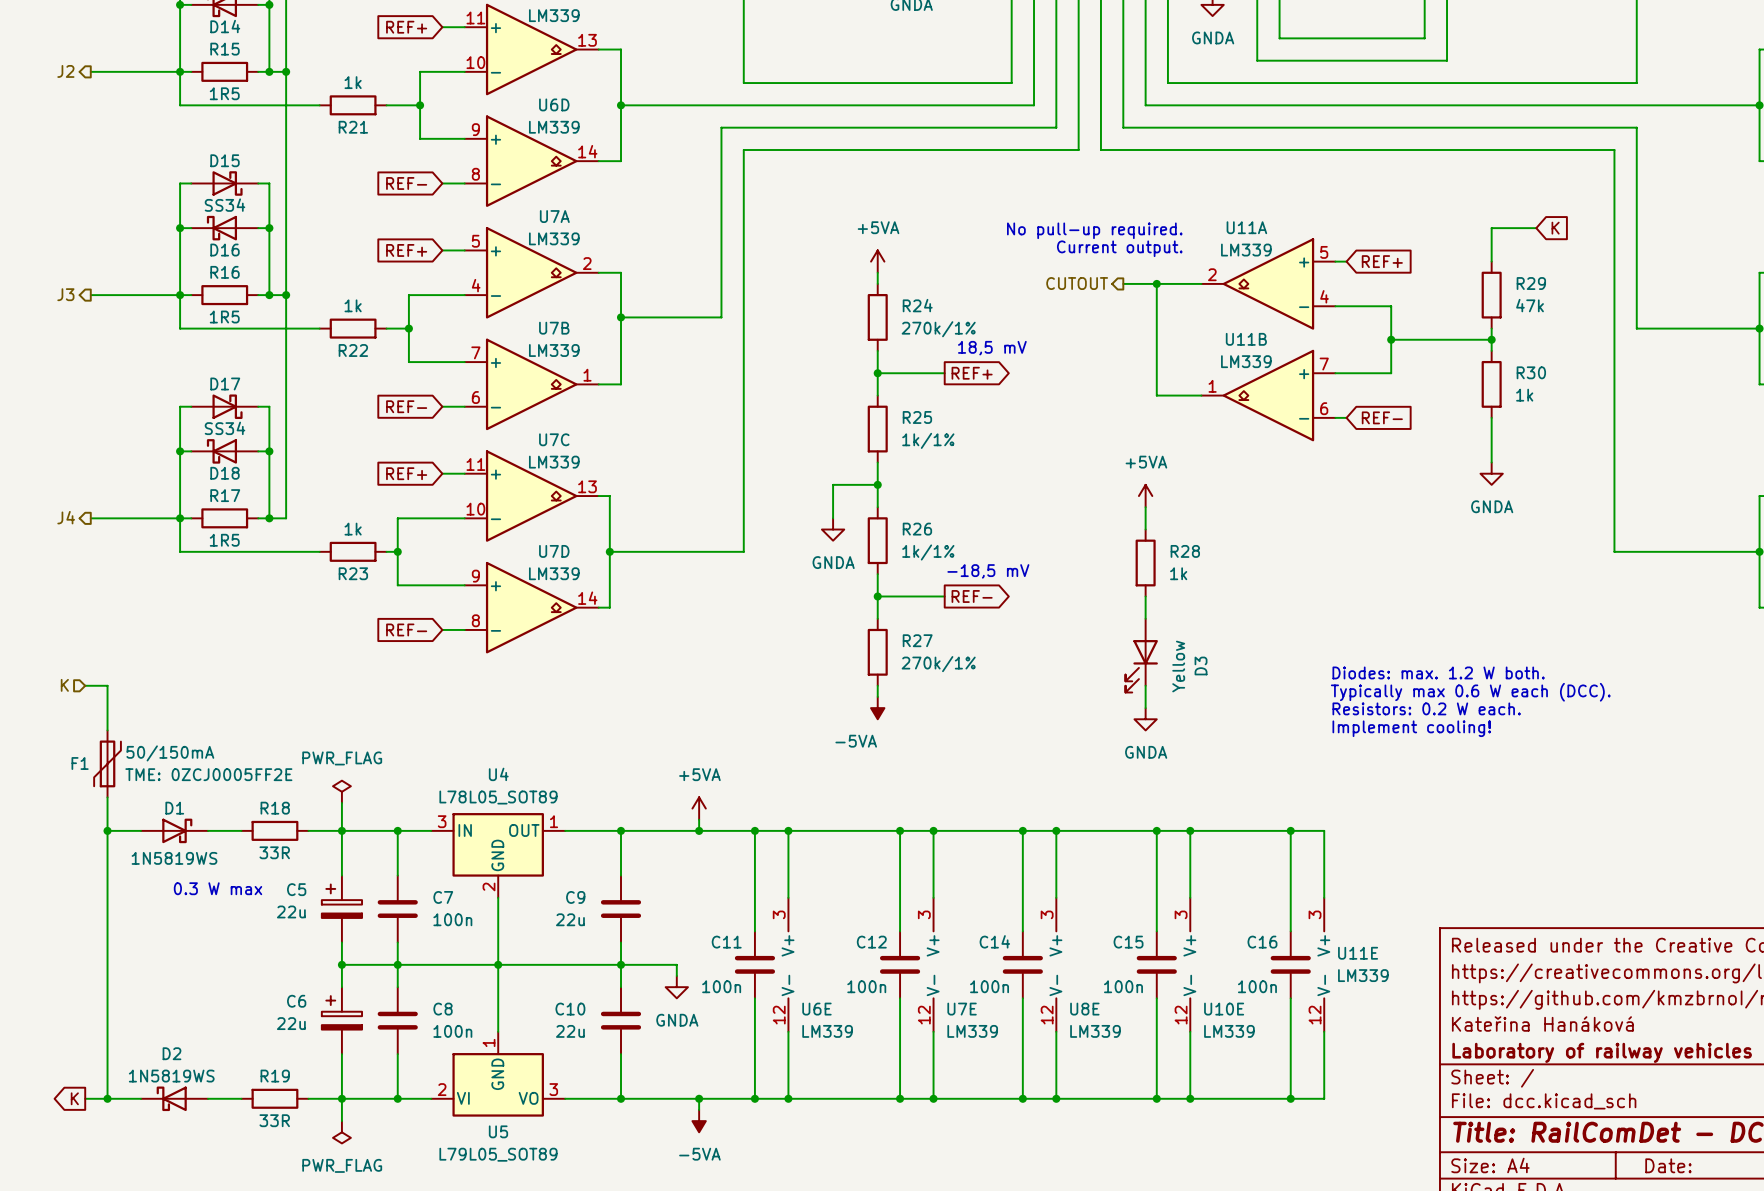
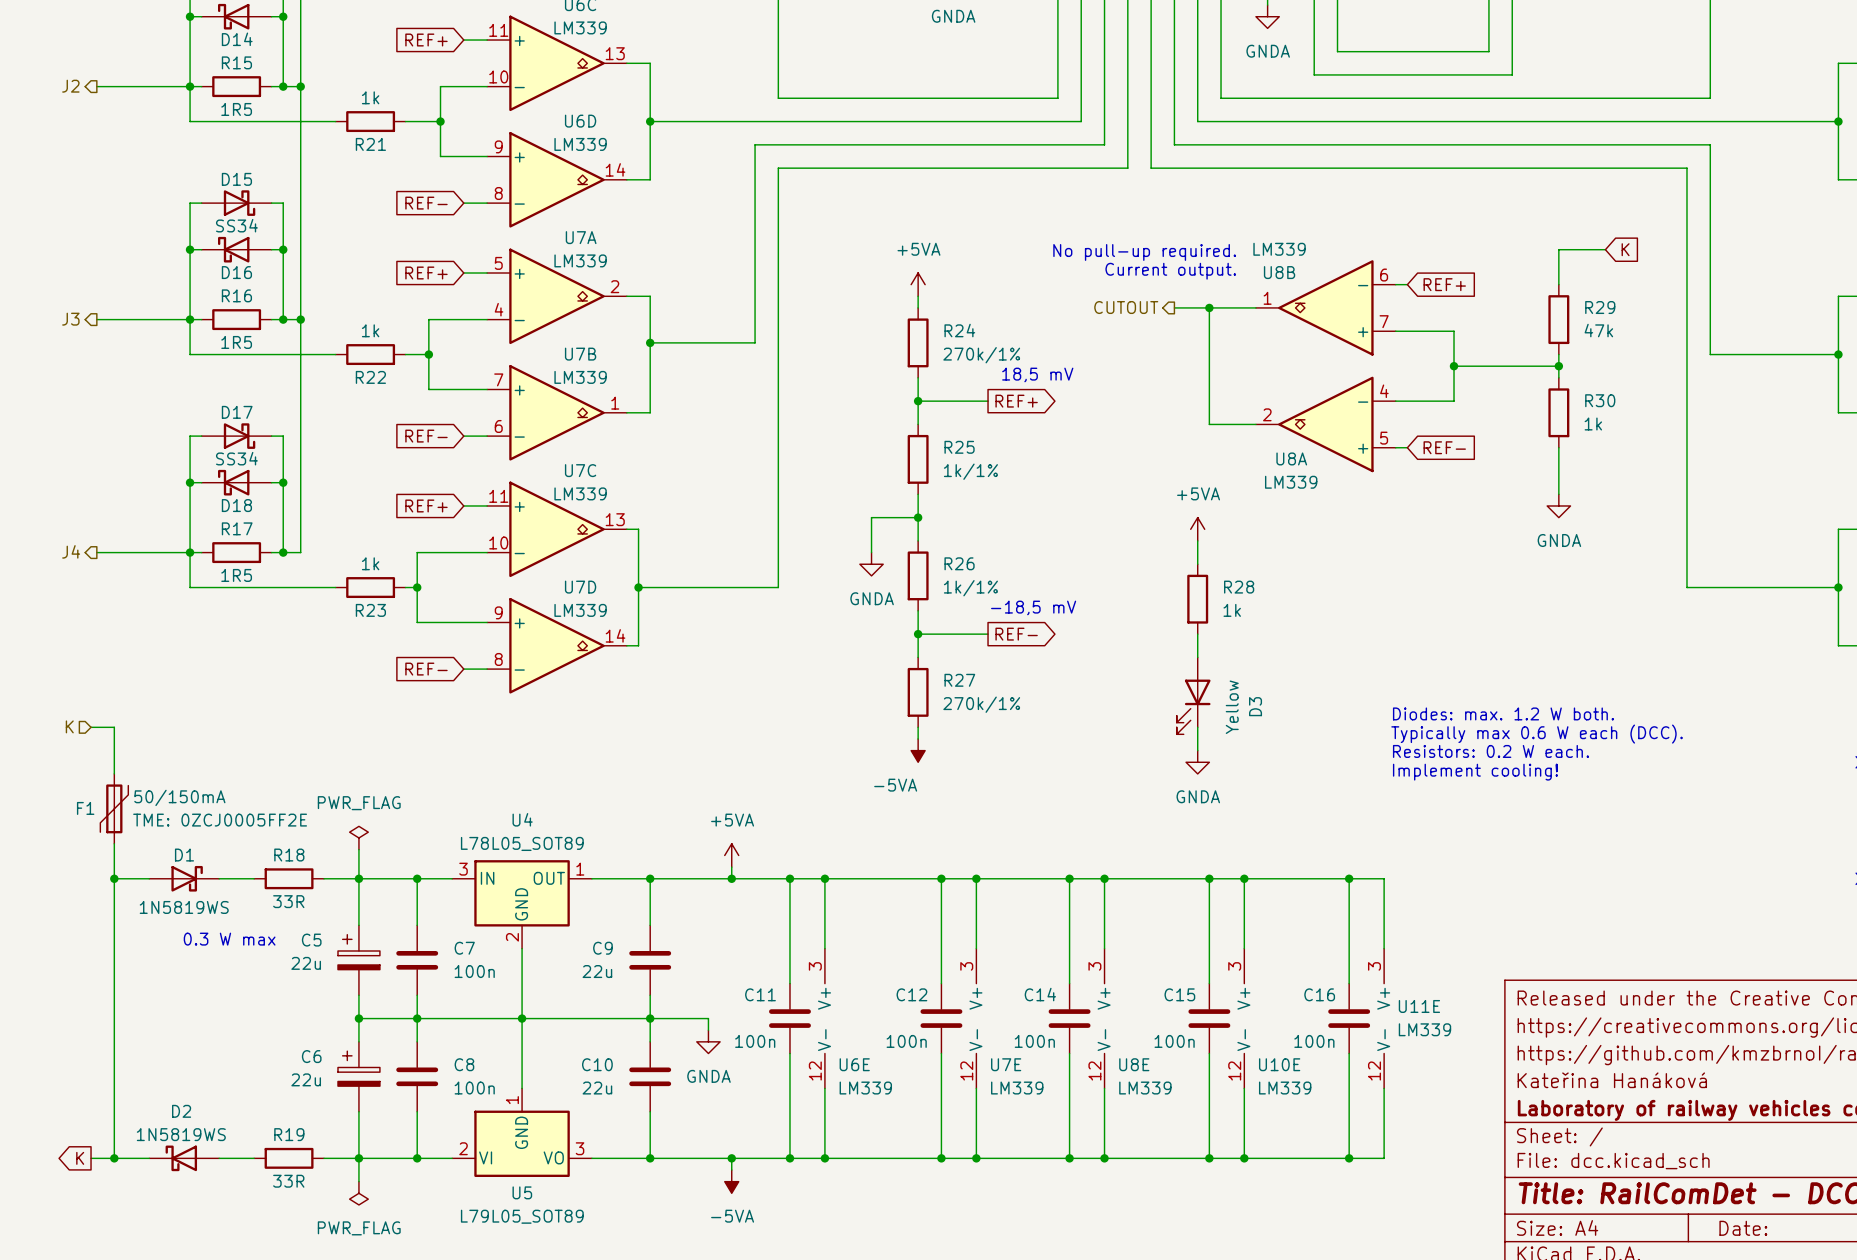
U11A: LM339 (1268, 283) -> none
U8B: none -> LM339 (1325, 307)
U11B: LM339 (1268, 395) -> none
U8A: none -> LM339 (1325, 424)

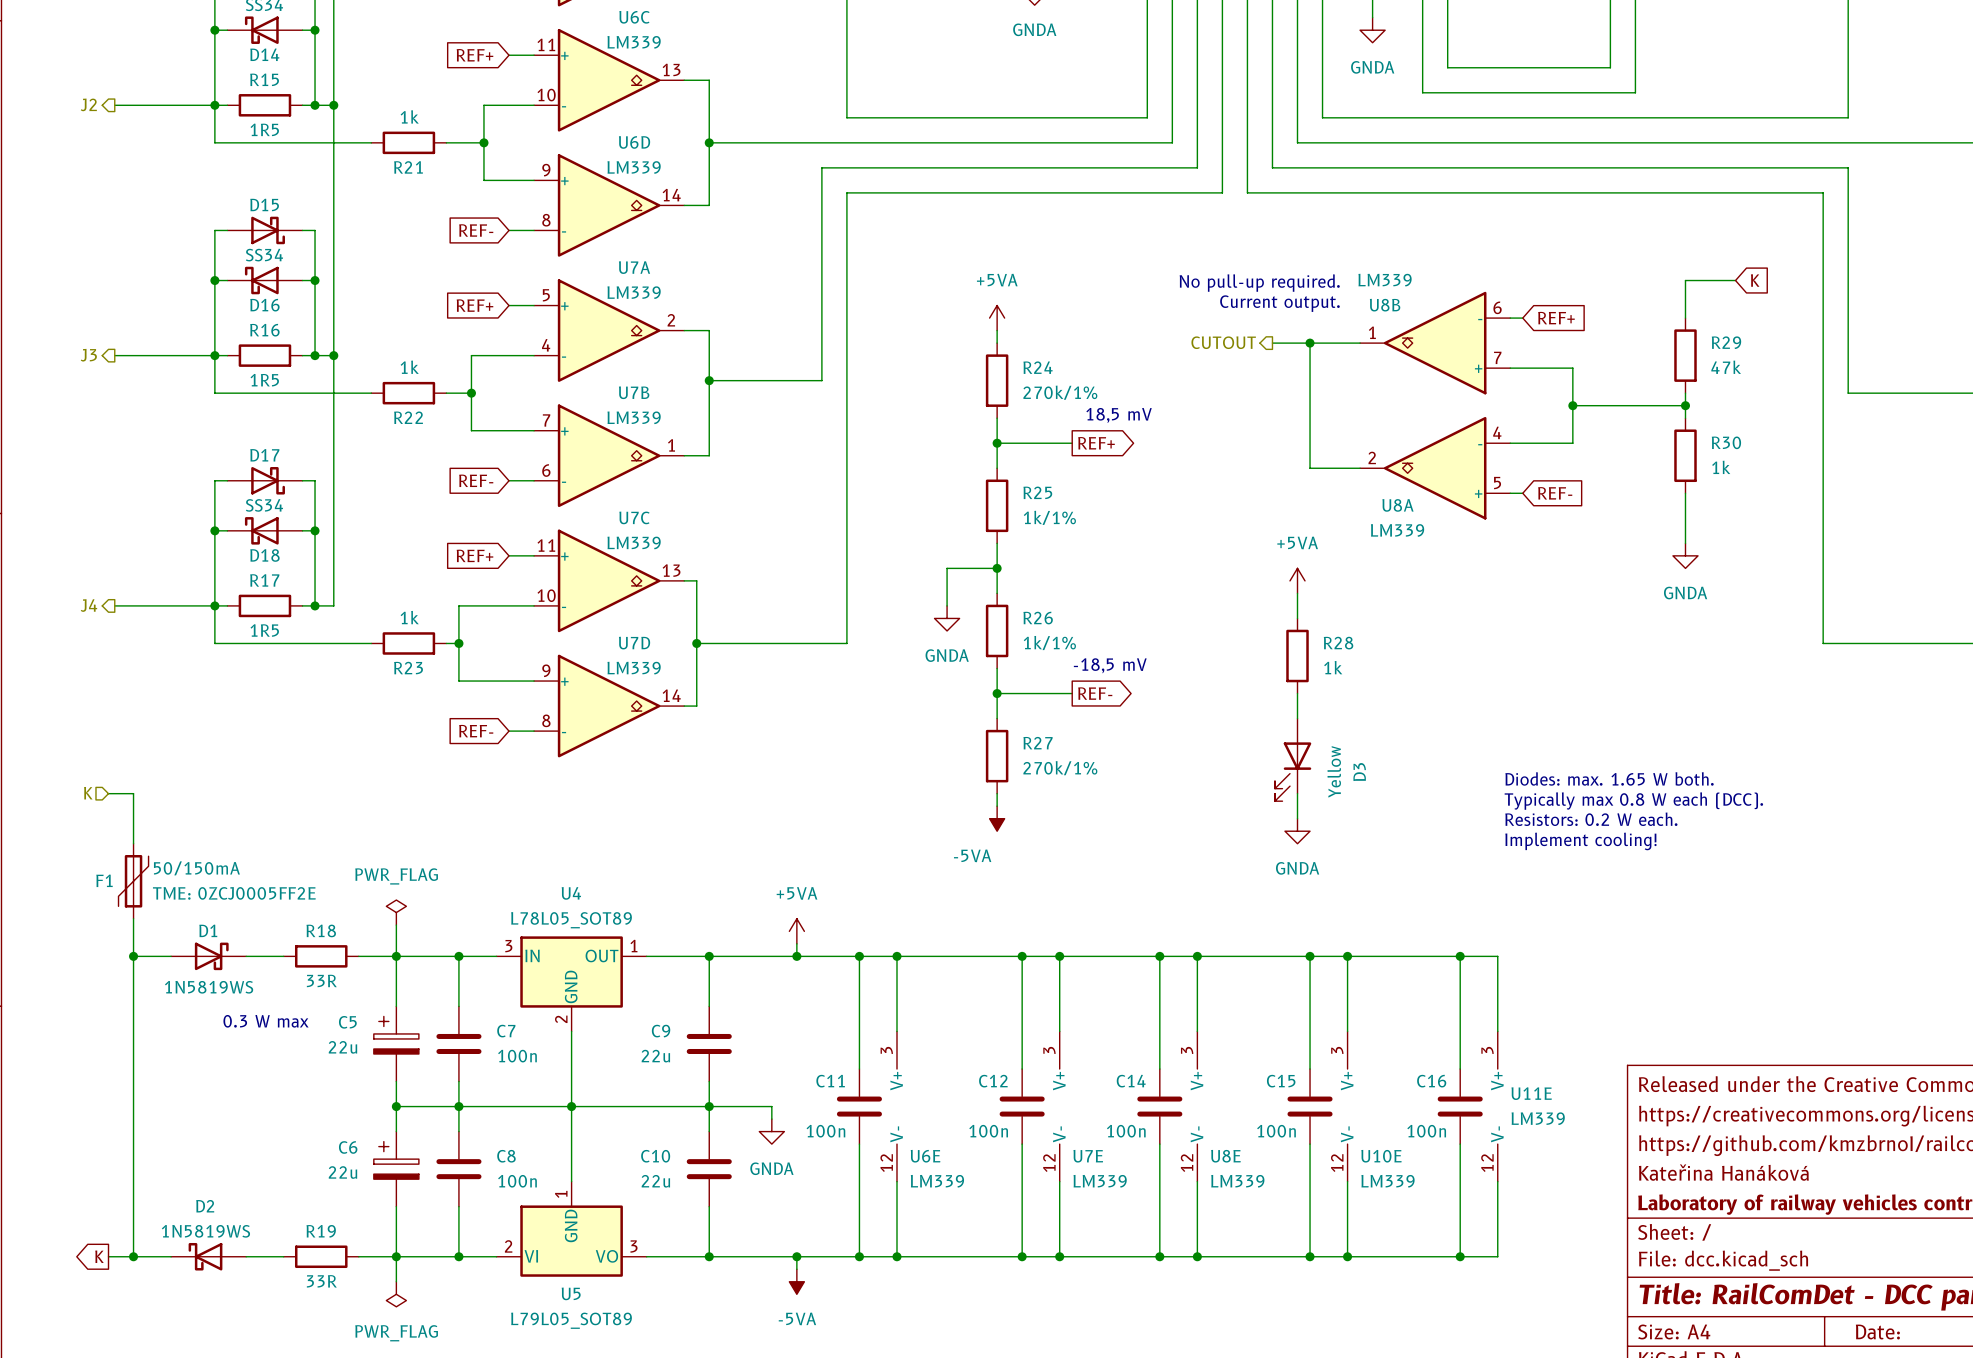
text: Diodes: max. 1.2 W both. (1503, 713) -> Diodes: max. 1.65 W both. (1609, 778)
text: Typically max 0.6 W each (DCC). (1537, 734) -> Typically max 0.8 W each (DCC). (1633, 801)

